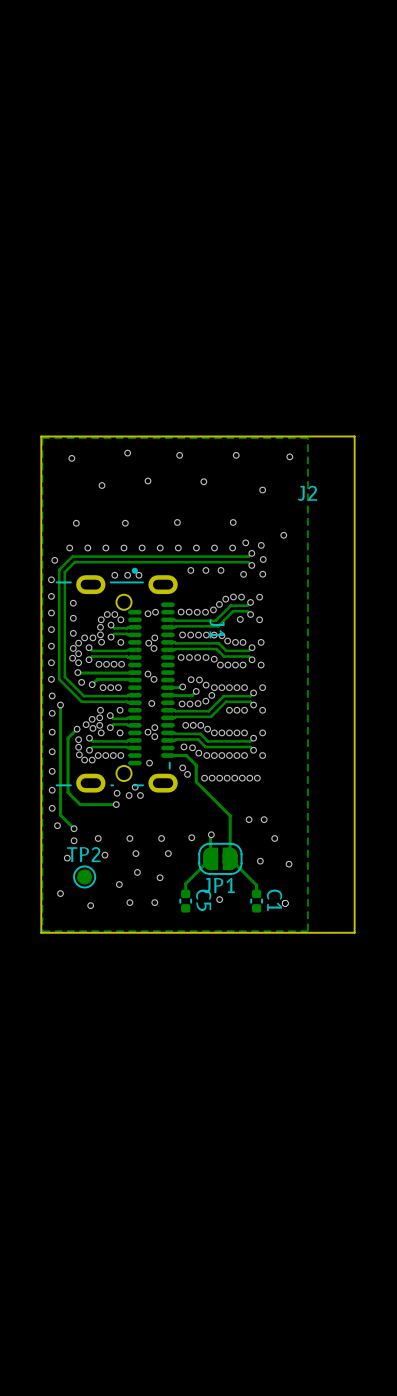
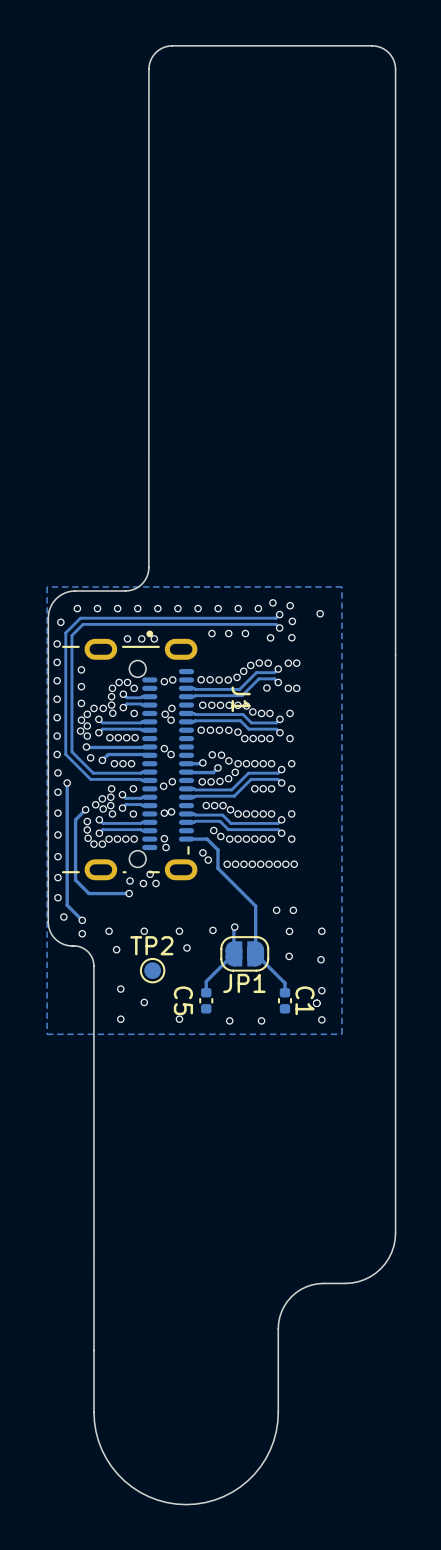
board edge: none -> (372, 45) (172, 45) (160, 48) (152, 57) (148, 69) (148, 570) (144, 581) (131, 590) (75, 591) (64, 593) (53, 601) (48, 614) (48, 924) (51, 934) (59, 942) (79, 946) (88, 951) (92, 958) (93, 966) (94, 1422) (101, 1449) (111, 1466) (124, 1480) (148, 1496) (176, 1504) (205, 1502) (232, 1492) (254, 1474) (265, 1458) (273, 1440) (277, 1422) (278, 1322) (281, 1311) (287, 1301) (295, 1292) (311, 1284) (351, 1283) (370, 1276) (385, 1263) (391, 1252) (395, 1239) (395, 69) (393, 60) (388, 52) (381, 47) (372, 45)
board edge: (354, 436) (354, 932) (41, 932) (41, 436) (354, 436) -> none
via: (127, 453) -> none
via: (179, 455) -> none
via: (236, 455) -> none
via: (289, 456) -> none
via: (71, 458) -> none
via: (148, 480) -> none
via: (203, 481) -> none
via: (101, 485) -> none
via: (262, 490) -> none
J2: (307, 493) -> none
via: (177, 522) -> none
via: (233, 522) -> none
via: (76, 523) -> none
via: (125, 523) -> none
zone outline: (307, 528) (307, 438) (42, 438) (42, 528) -> (341, 586) (47, 586)
via position: (283, 535) -> (320, 613)
via: none -> (296, 663)
via: none -> (296, 688)
via: (151, 703) -> none
via: none -> (172, 781)
via: none -> (163, 786)
via: (154, 727) -> none
via: none -> (171, 811)
via: (154, 736) -> none
via: (183, 746) -> none
via: none -> (164, 838)
via: none -> (294, 864)
via: none -> (289, 931)
via: (274, 838) -> none
via: none -> (321, 931)
via: (135, 853) -> none
via: (67, 858) -> none
via: (137, 872) -> none
TP2 position: (84, 876) -> (152, 970)
via: (160, 877) -> none
via: (119, 884) -> none
via: none -> (120, 989)
via: none -> (321, 990)
via: (60, 893) -> none
via: (219, 899) -> none
C5 name position: C5 (203, 900) -> C5 (183, 1000)
via position: (154, 902) -> (179, 1019)
via: (90, 905) -> none
via: none -> (120, 1019)
via: none -> (321, 1019)
via: none -> (229, 1020)
via: none -> (261, 1020)

